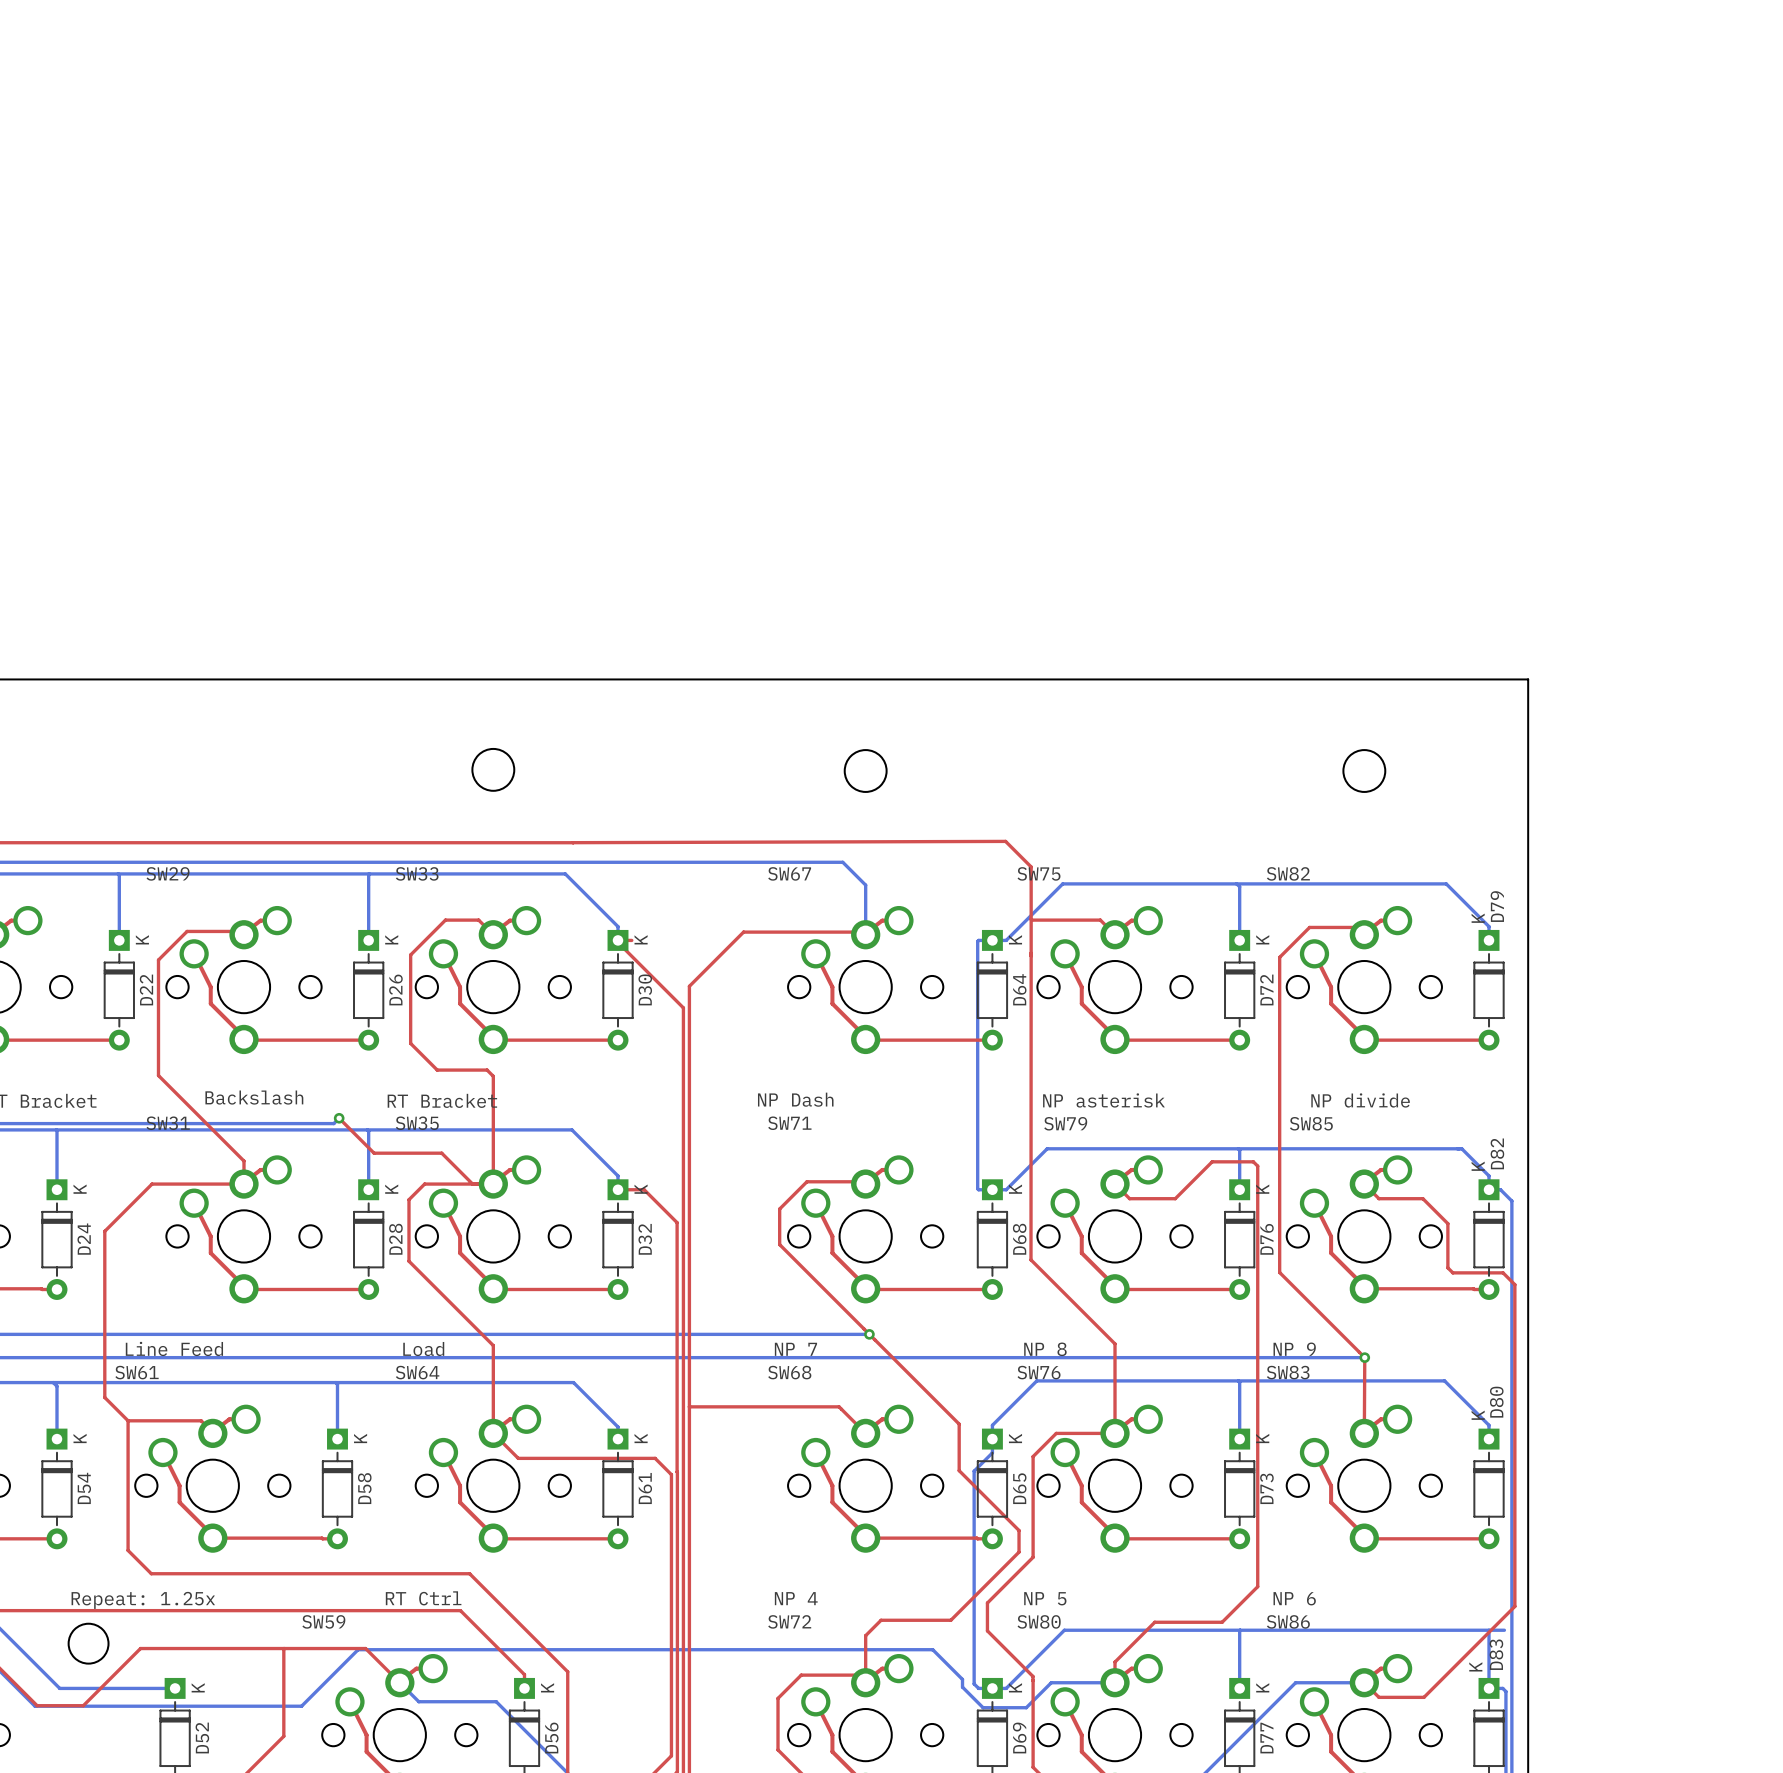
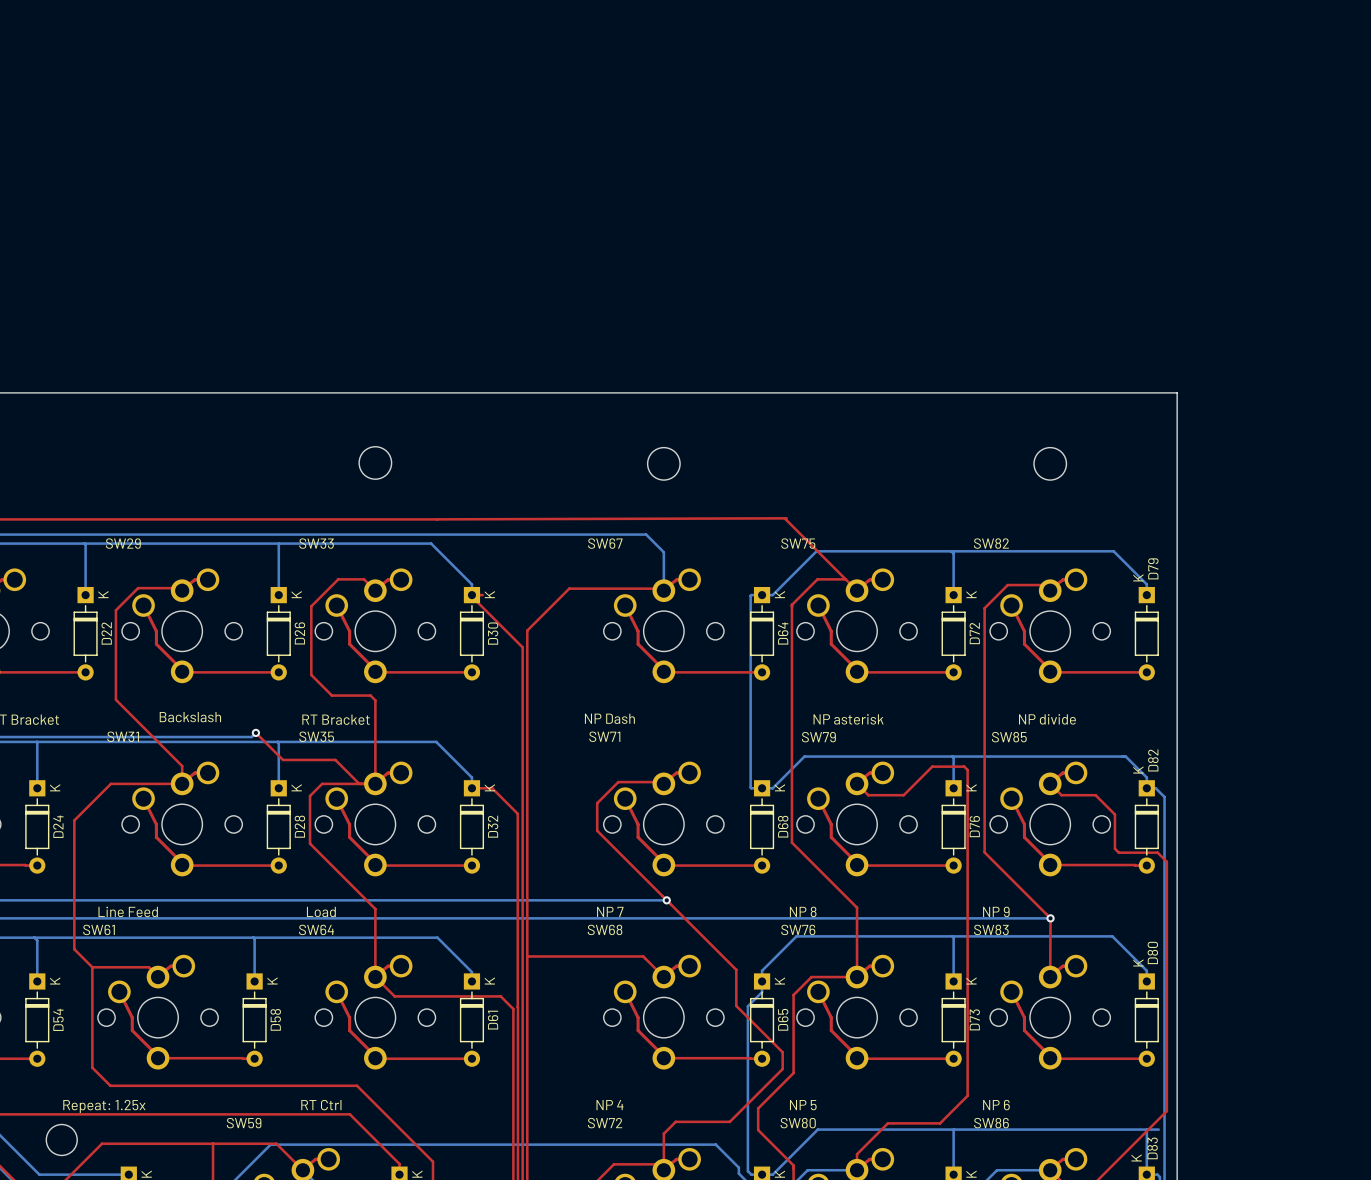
top track: (1005, 841) (1031, 866) (1030, 1259) -> (817, 579) (791, 604) (791, 842)
top track: none -> (772, 518) (786, 518)
top track: none -> (785, 519) (845, 579)
top track: (1031, 919) (1063, 920) -> none

